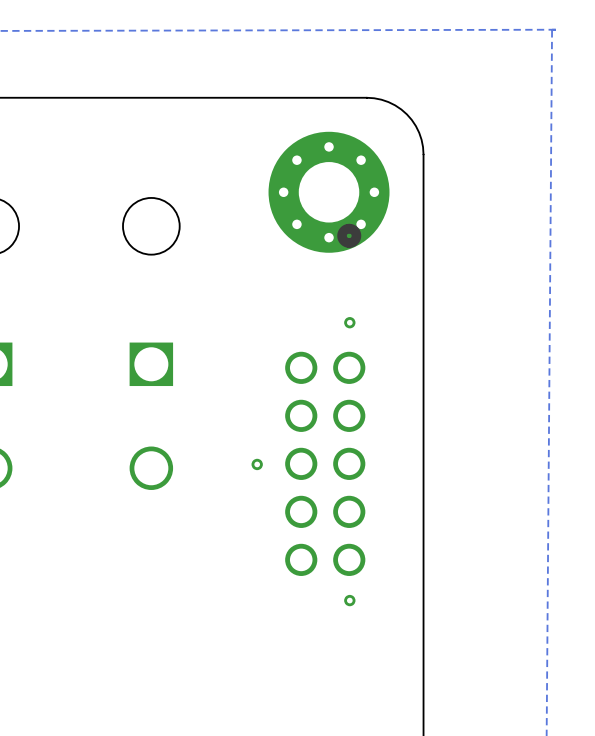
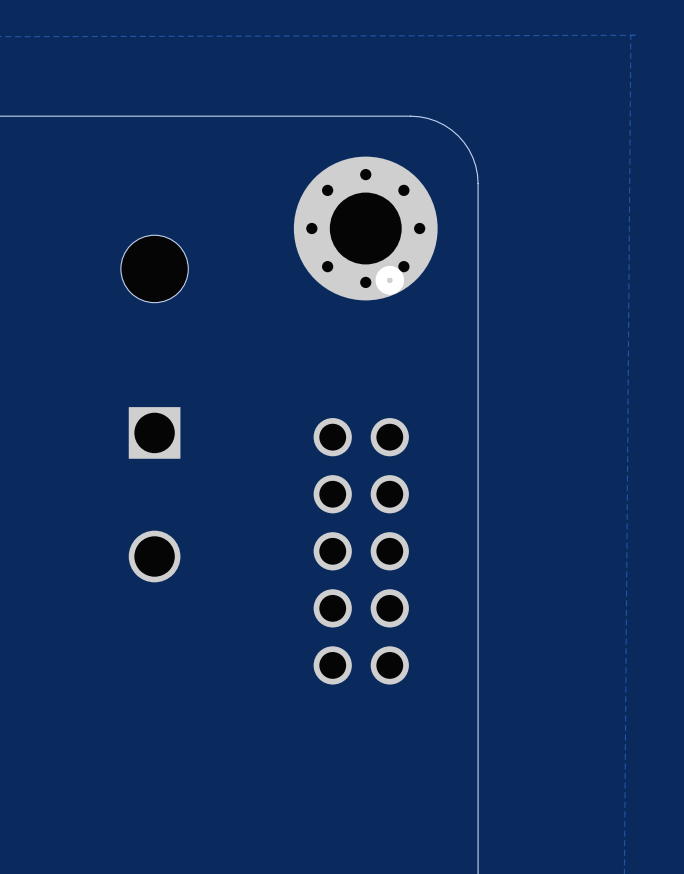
via: (349, 322) -> none
via: (257, 464) -> none
via: (349, 600) -> none

